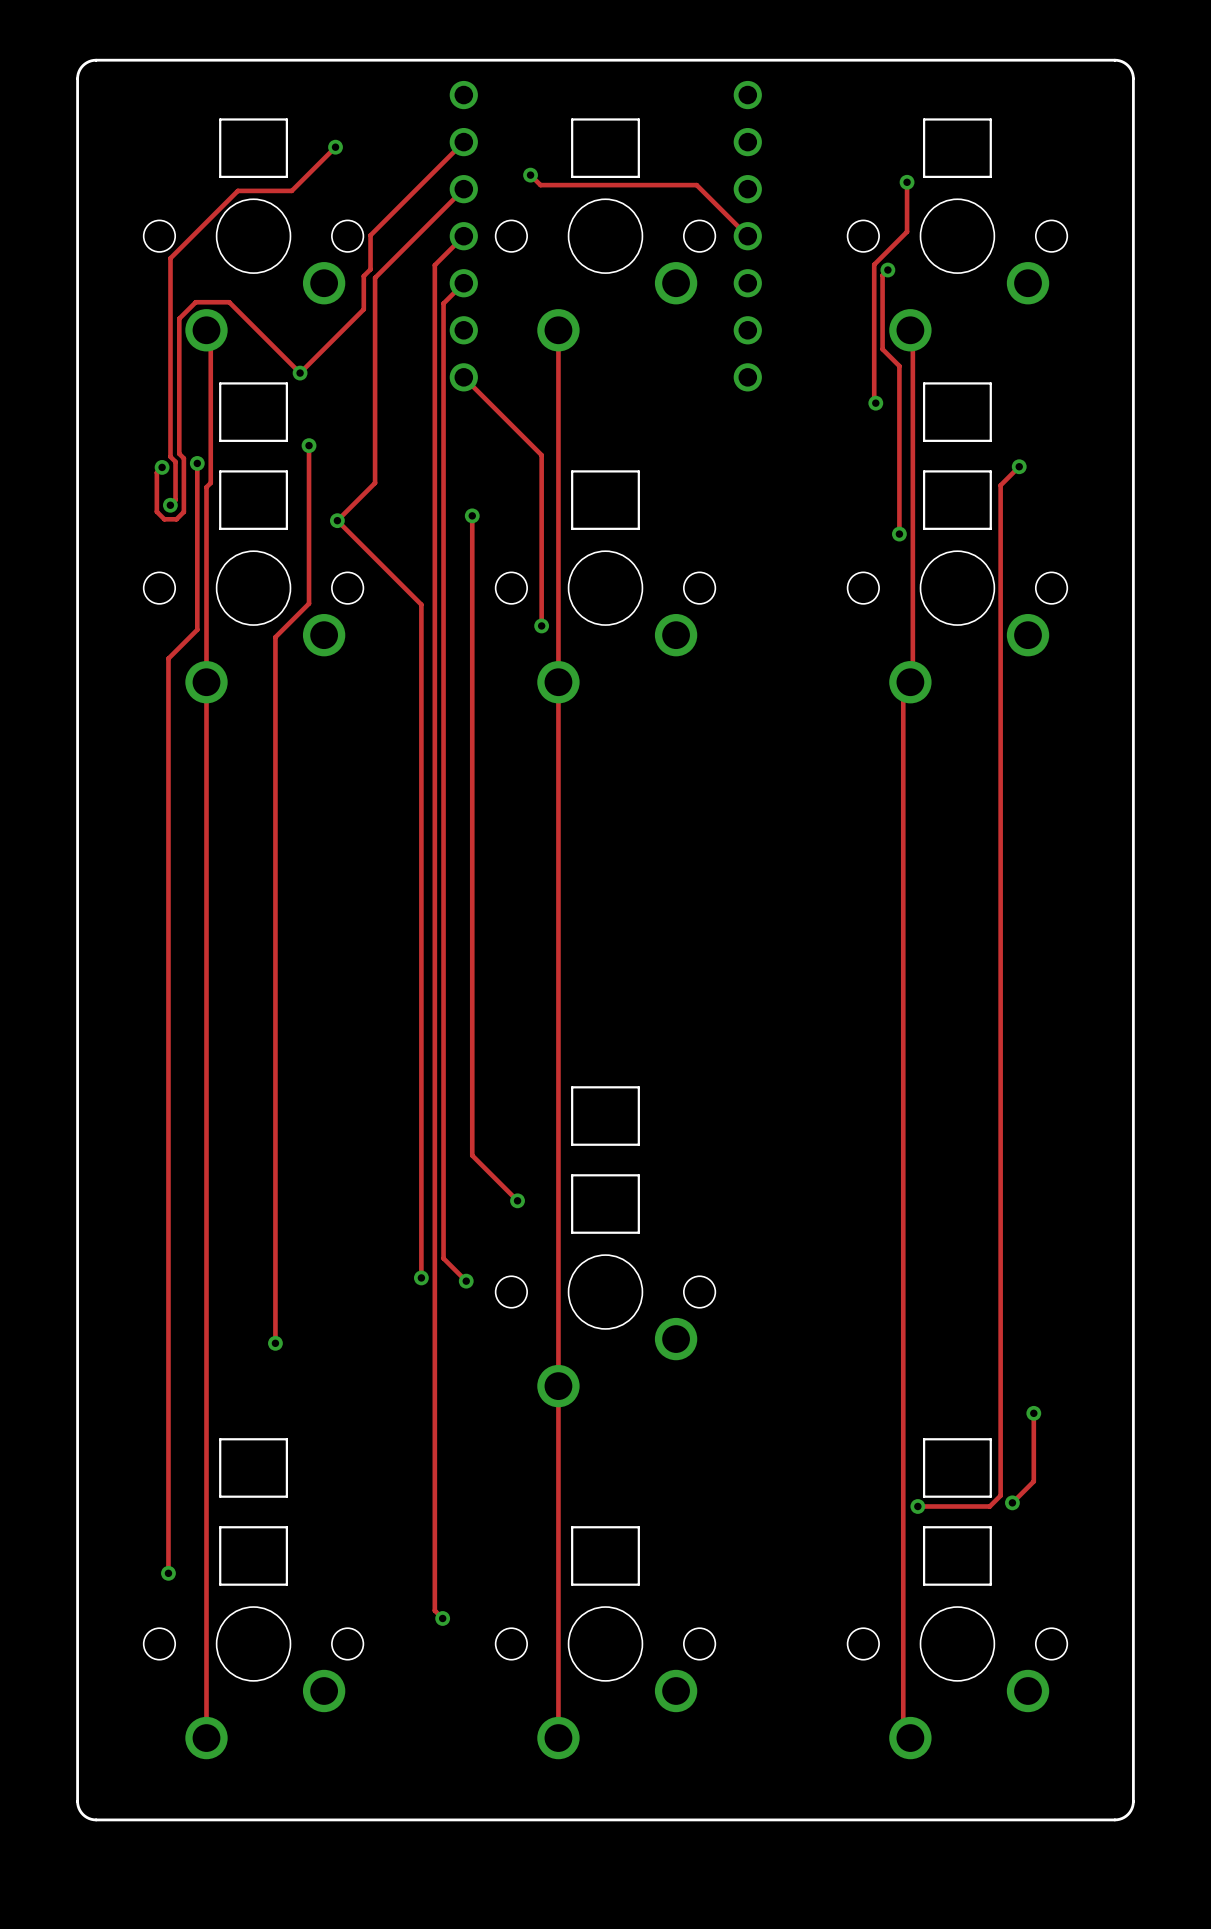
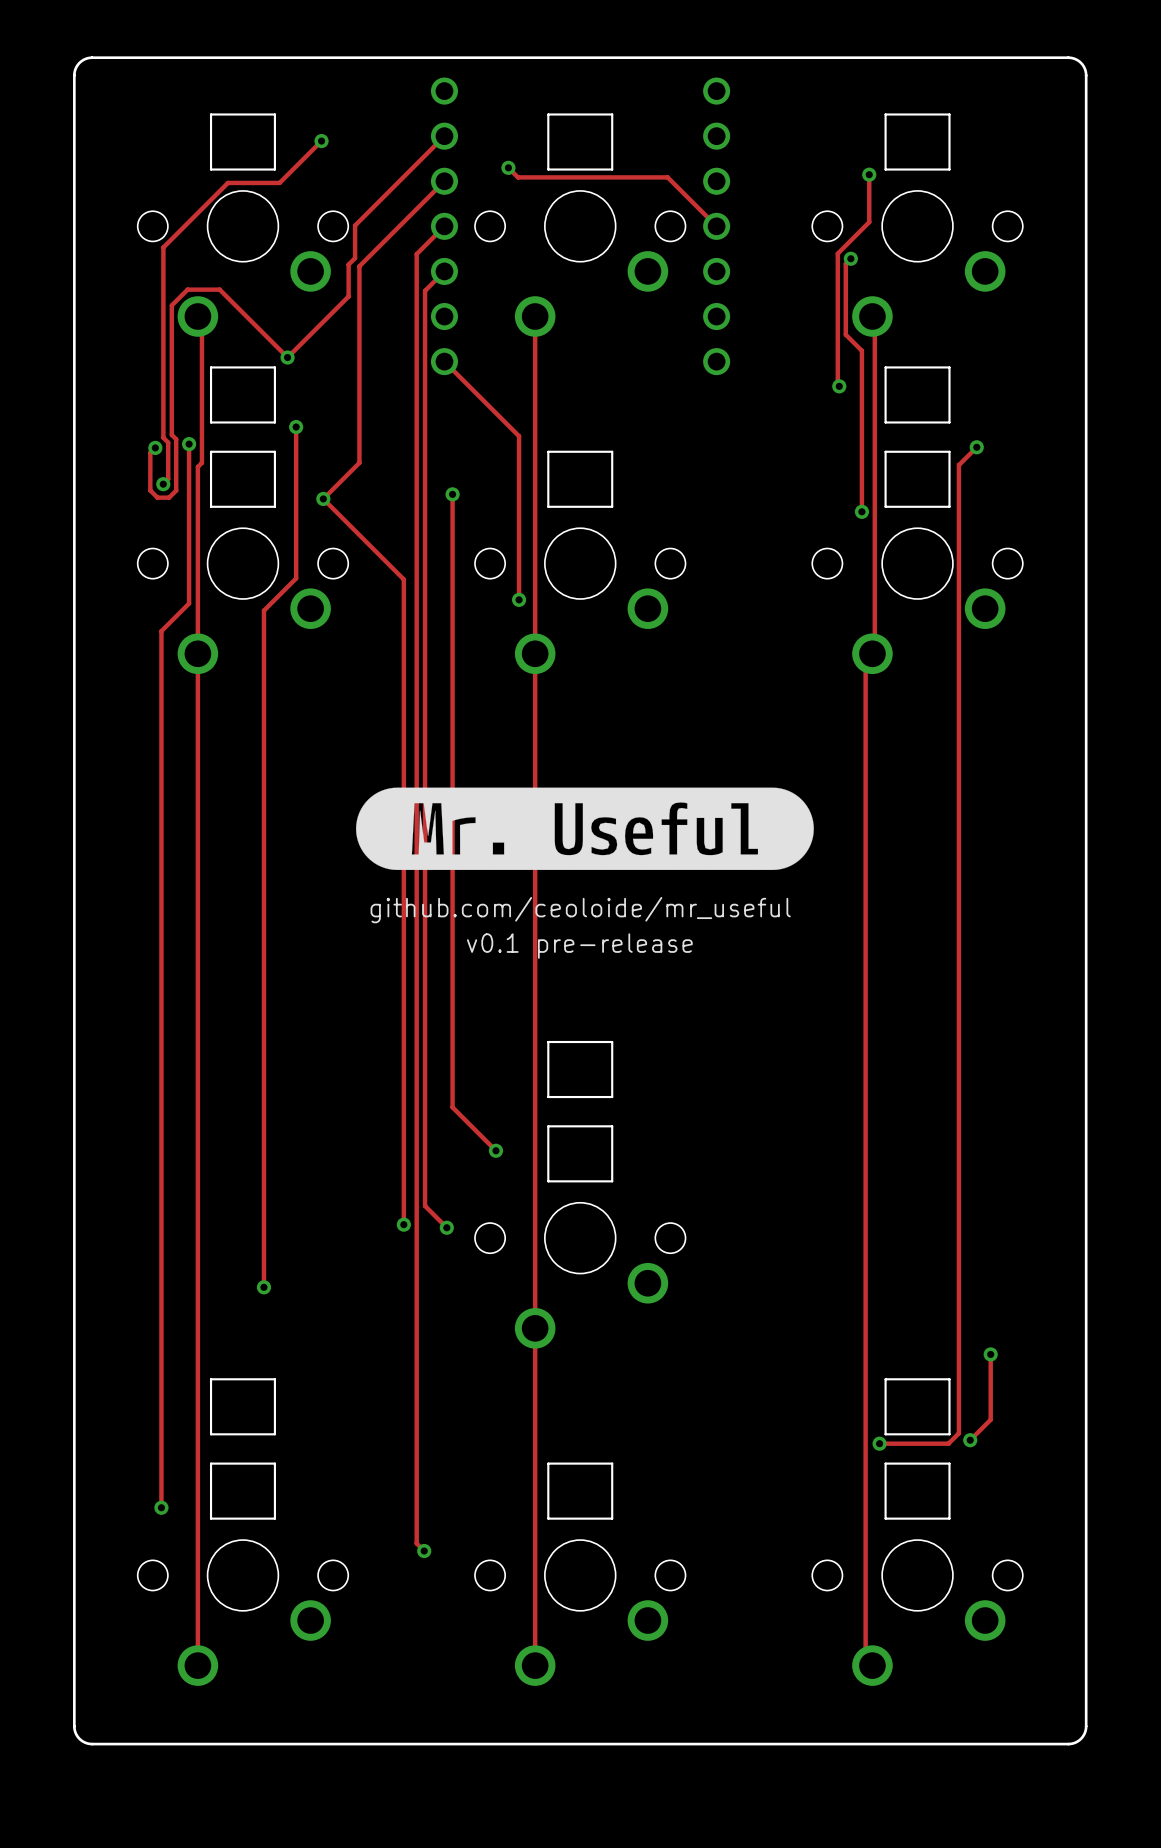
drawing: none -> [356, 787, 814, 871]

